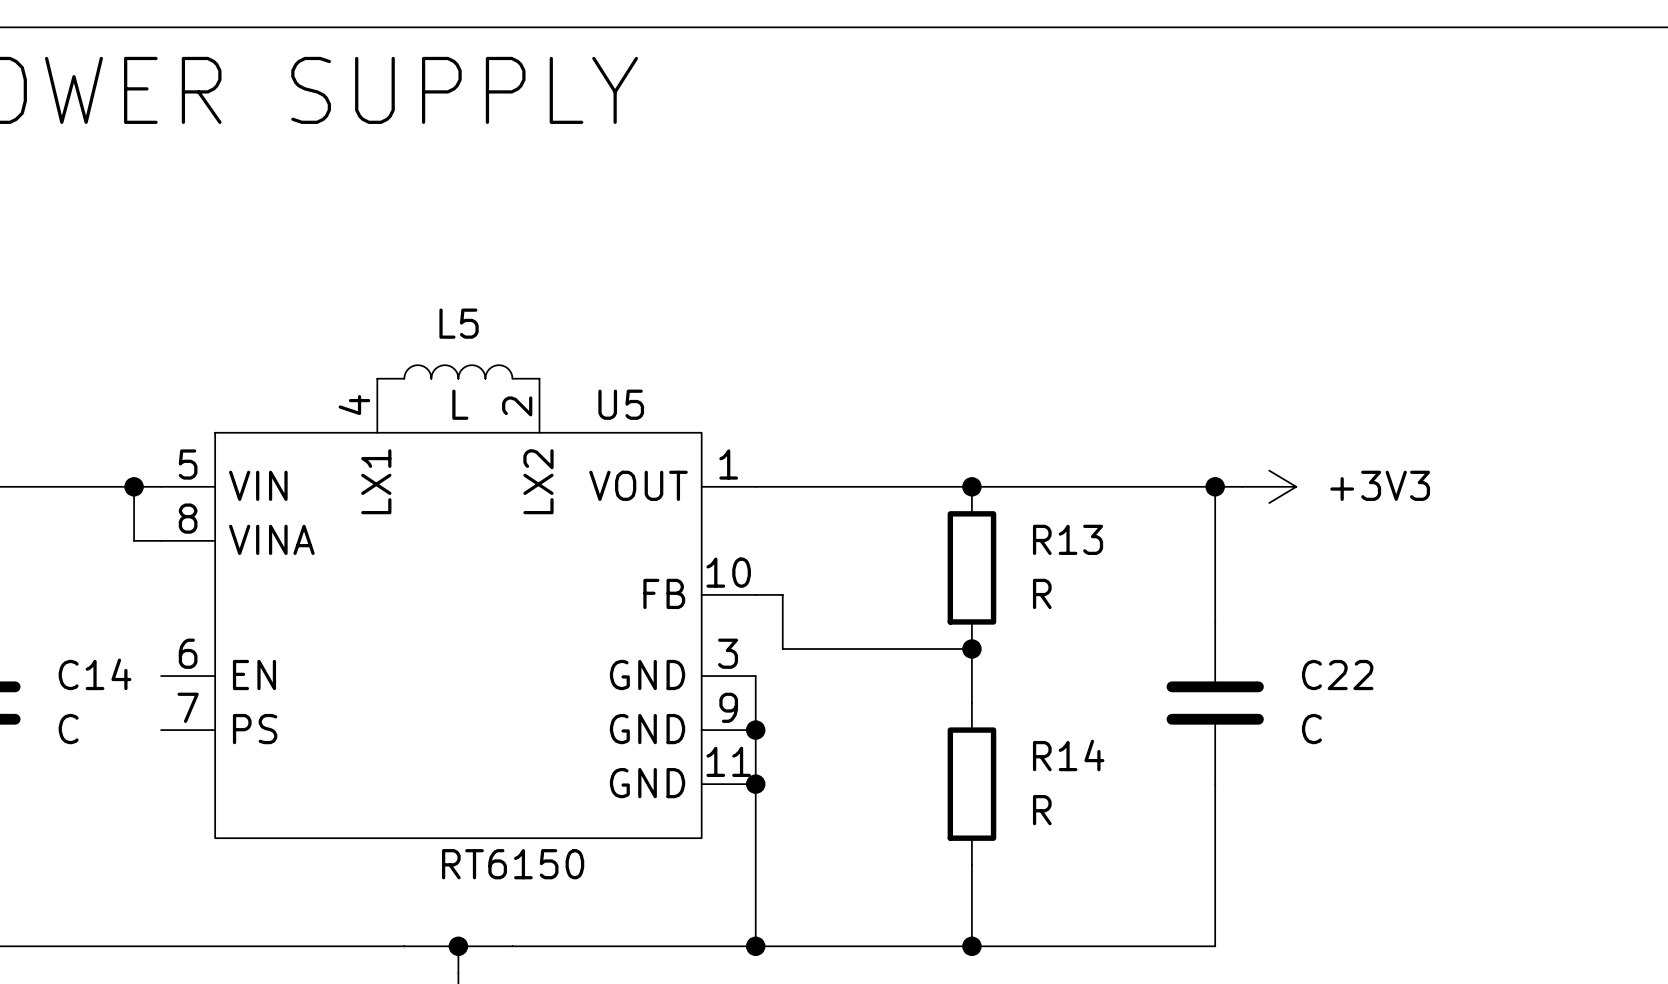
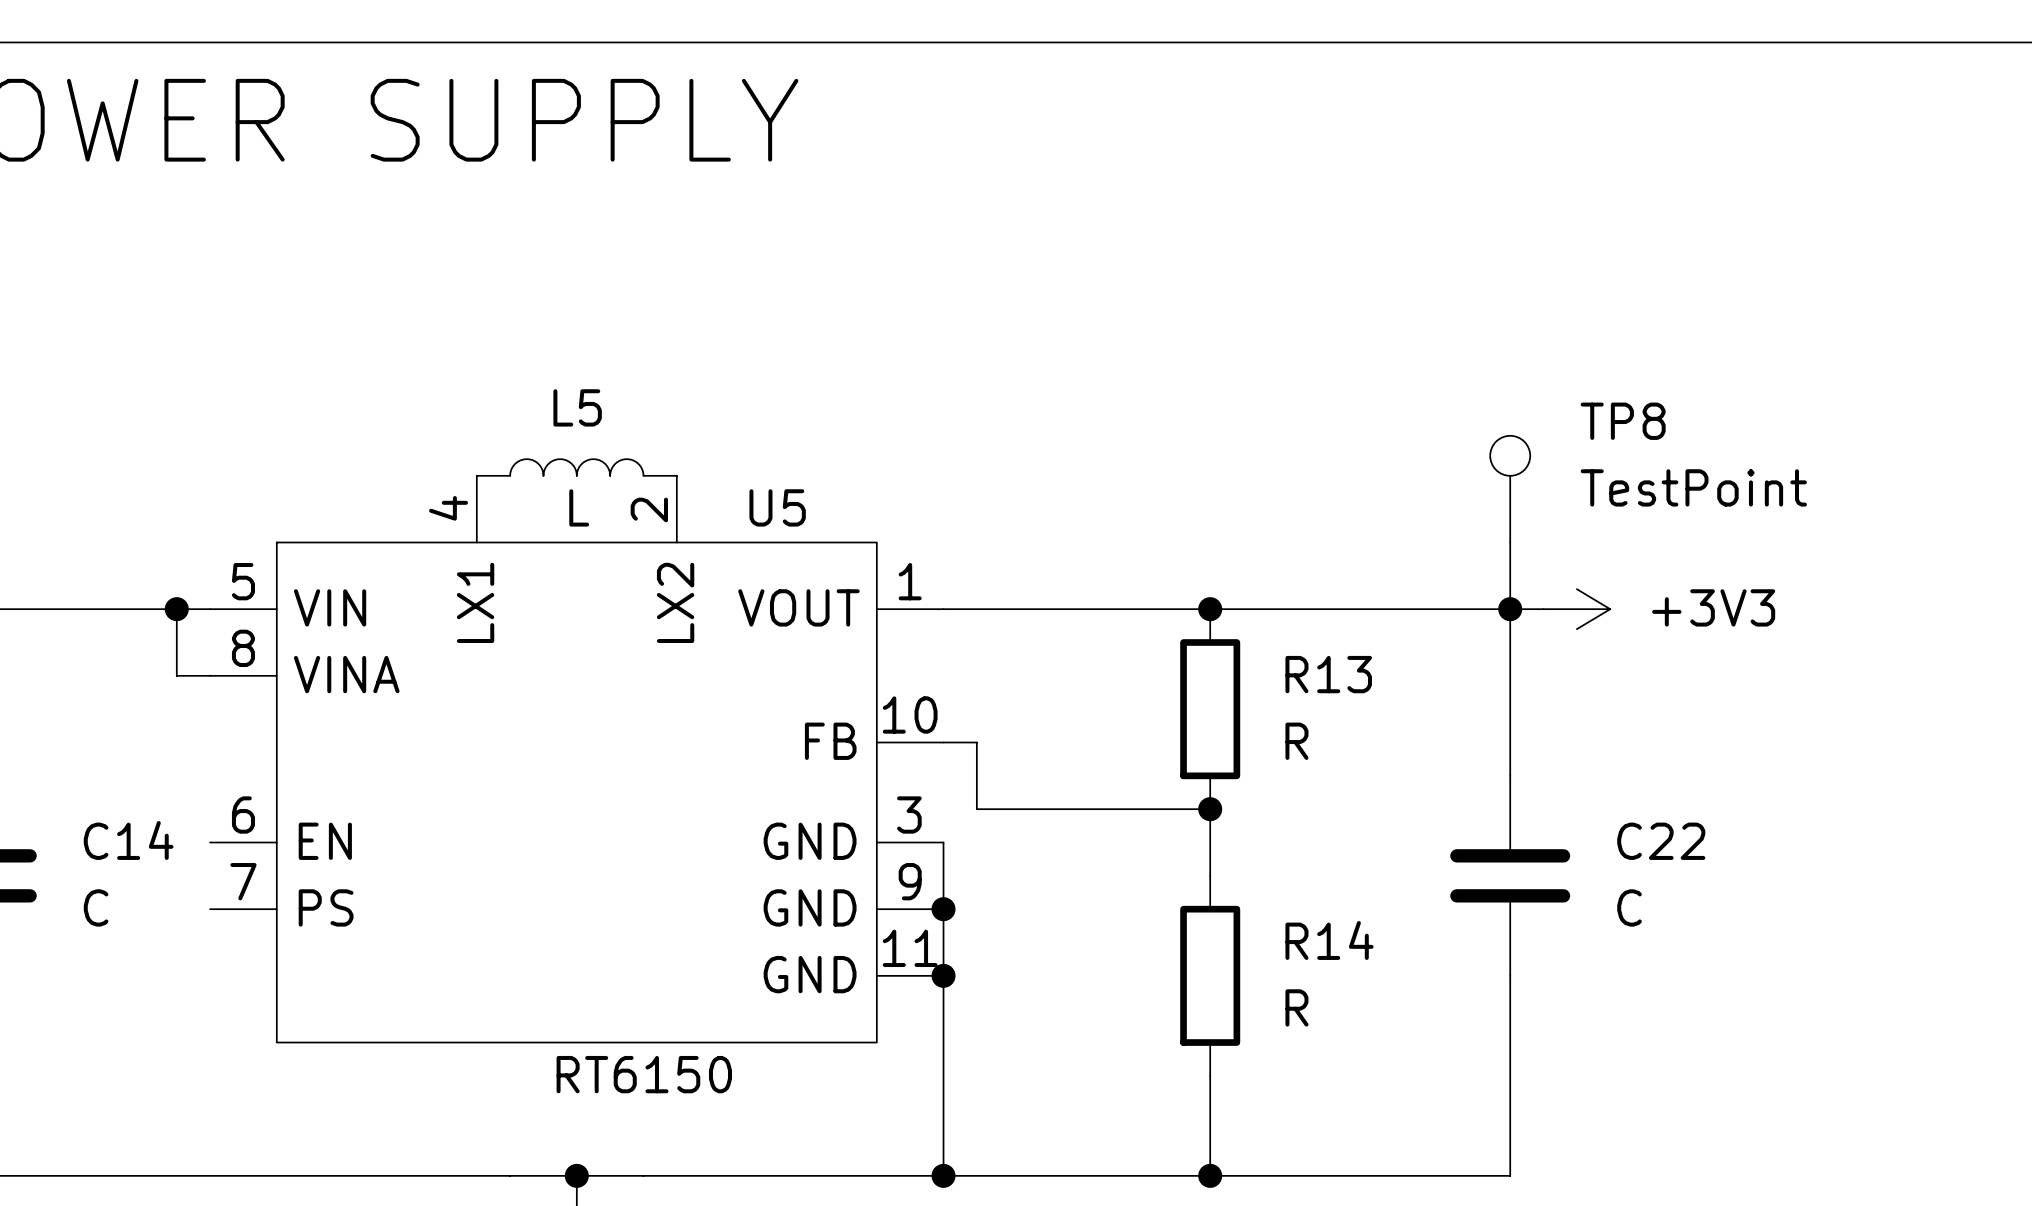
TP8: none -> TestPoint (1510, 489)
wire: none -> (1510, 542) (1510, 609)

